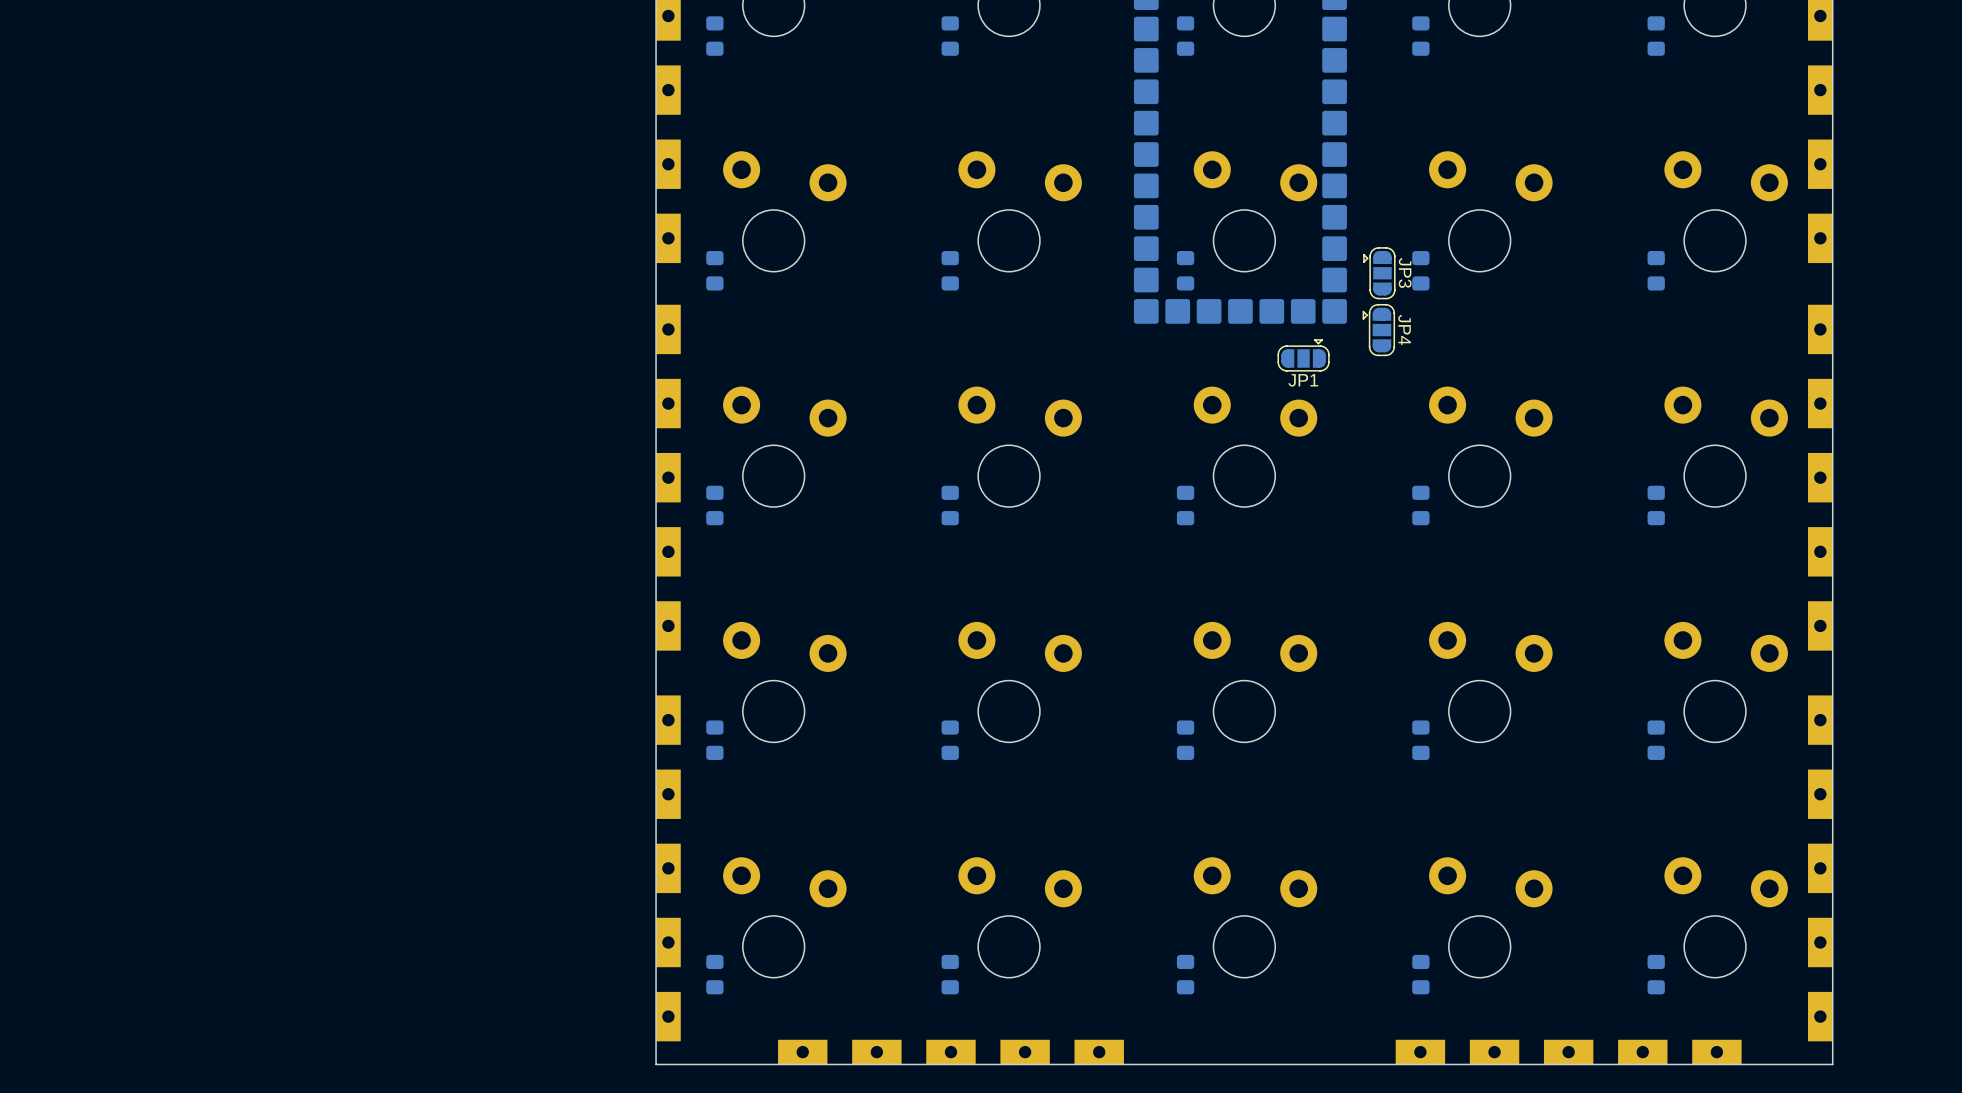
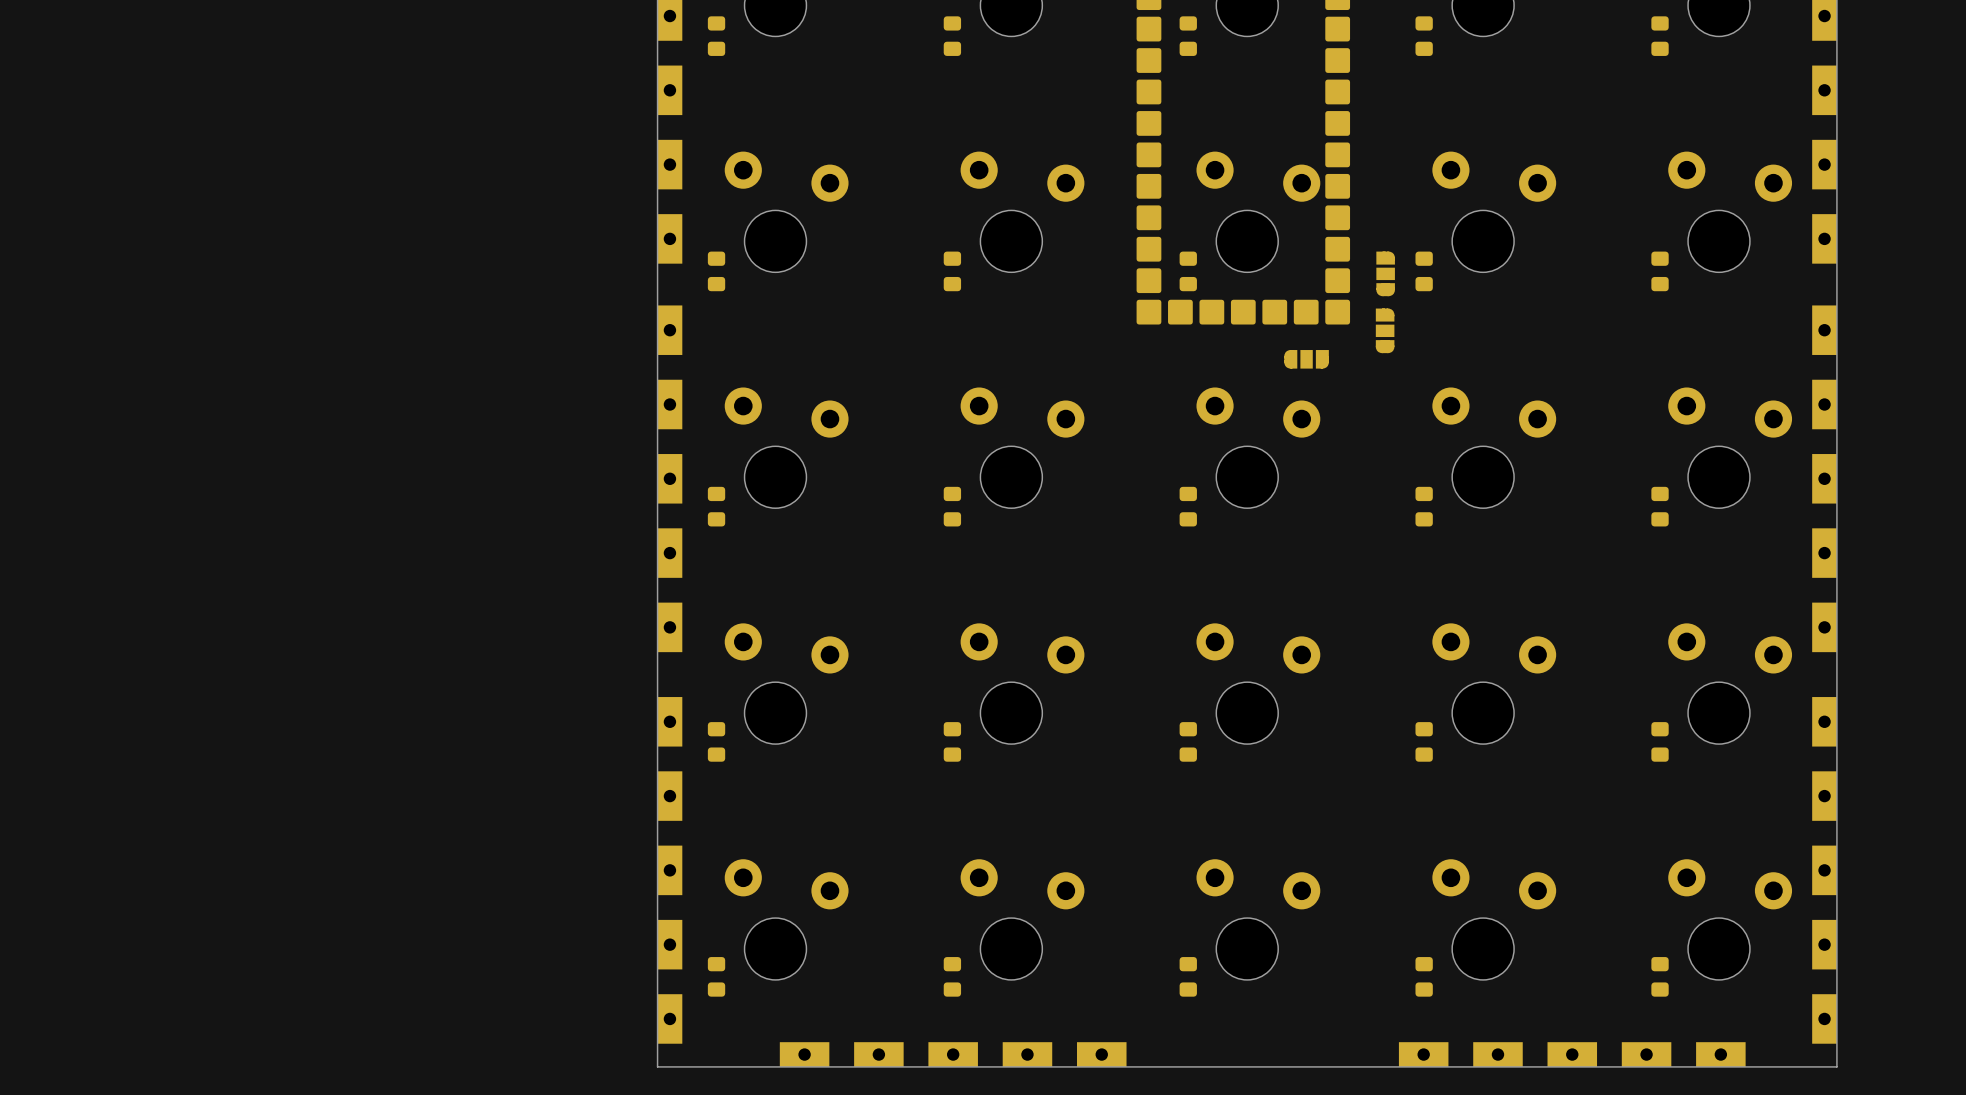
JP3: (1379, 273) -> none
part: none -> (1385, 273)
JP4: (1378, 330) -> none
part: none -> (1385, 330)
JP1: (1303, 355) -> none
part: none -> (1306, 359)

